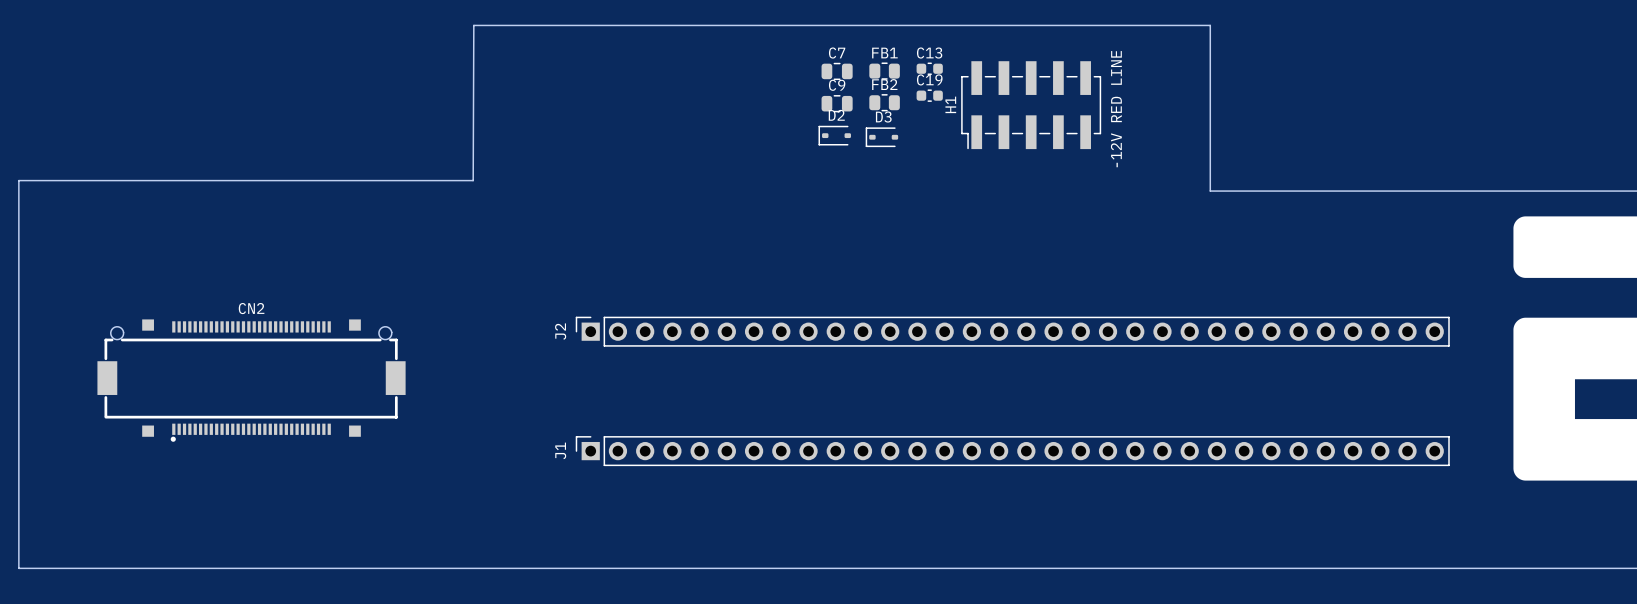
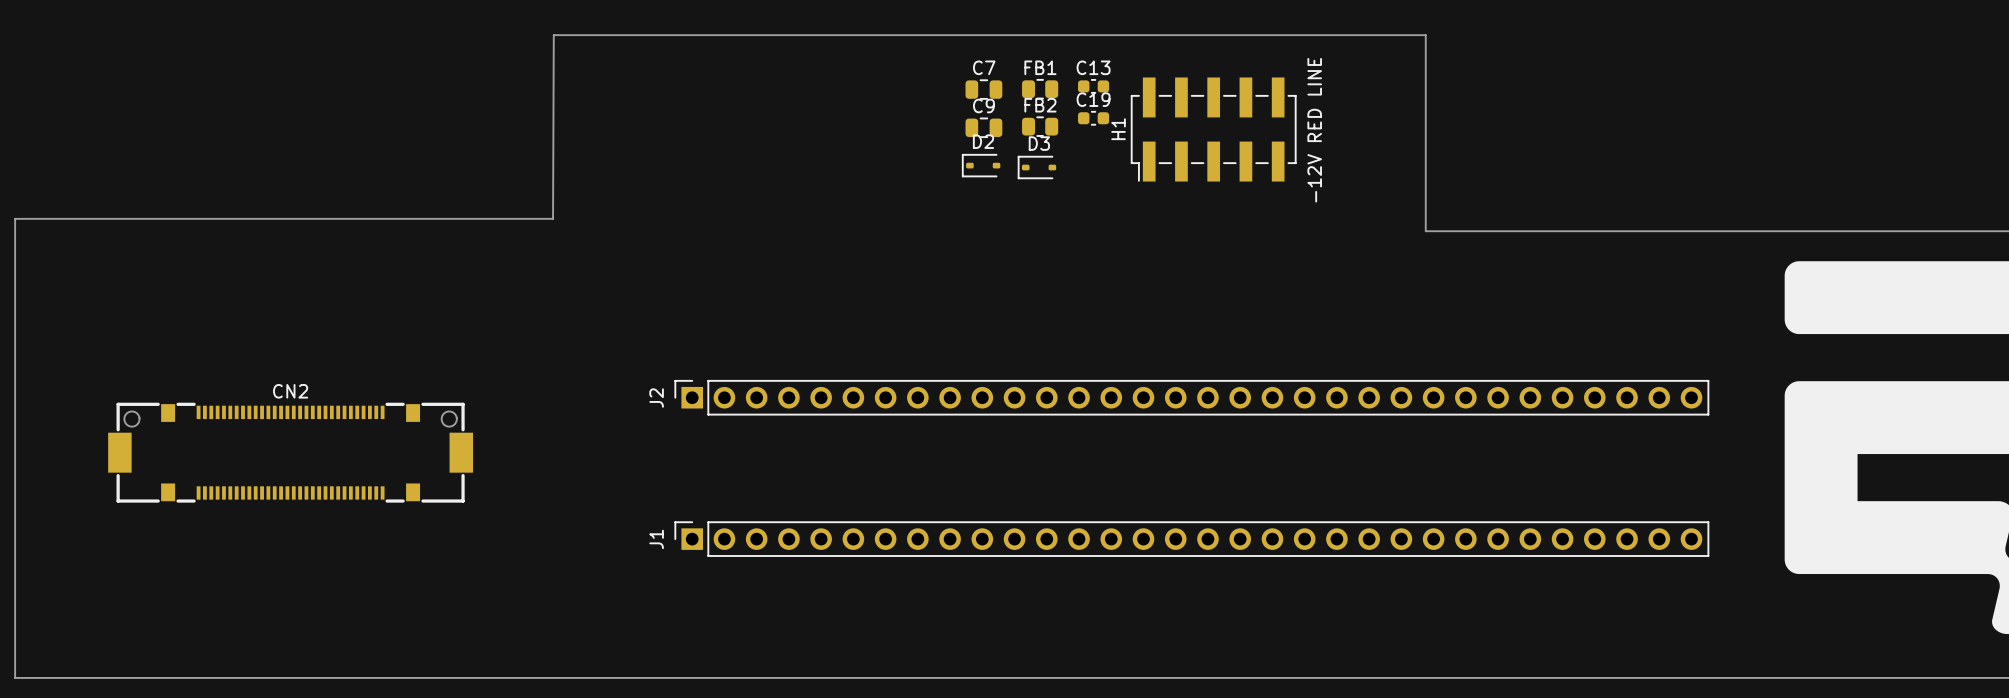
CN2 footprint: [97, 319, 406, 442] -> [108, 402, 474, 503]

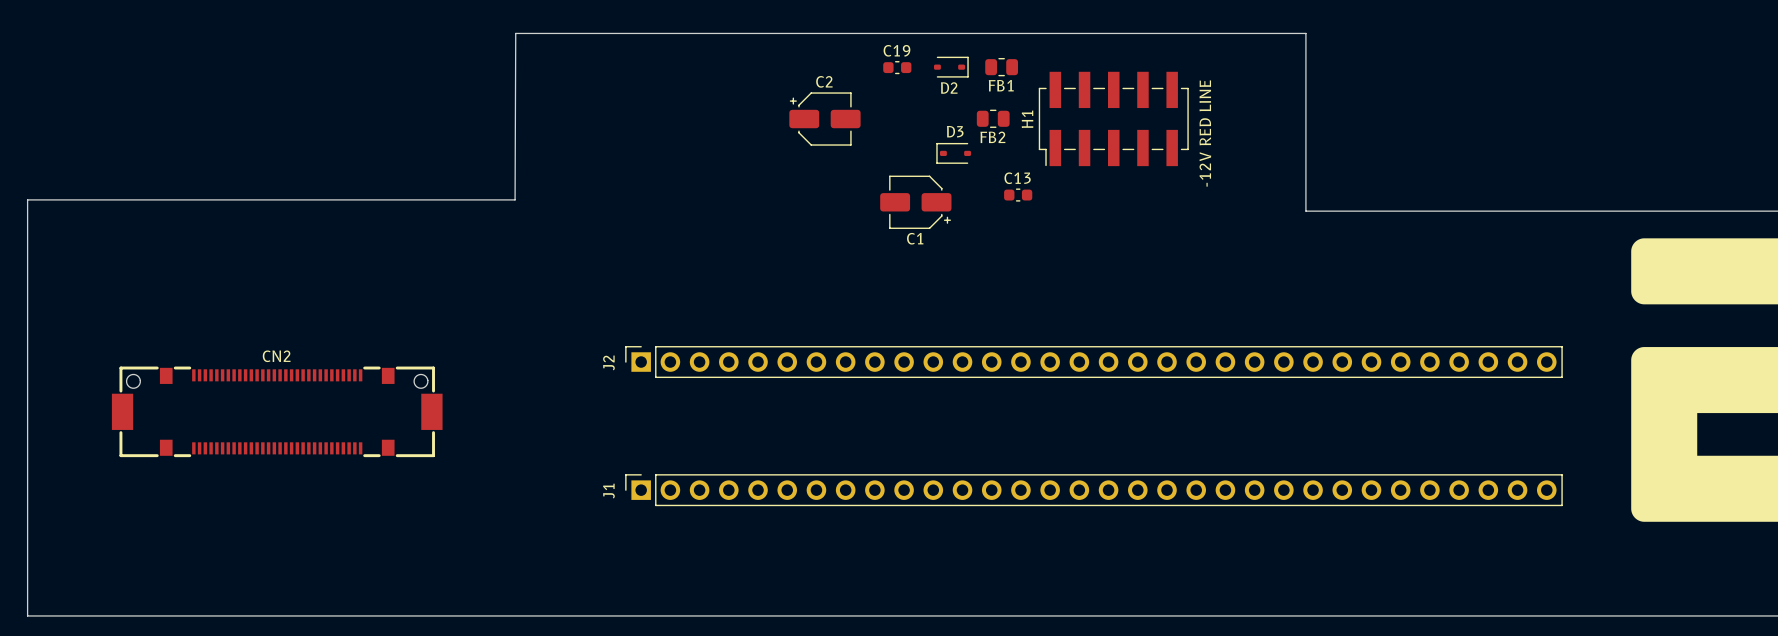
FB1 name position: FB1 (1040, 67) -> FB1 (1001, 85)
C13 position: (1093, 86) -> (1018, 195)
C7: (983, 89) -> none
FB1 position: (1040, 89) -> (1001, 67)
FB2 name position: FB2 (1040, 105) -> FB2 (992, 137)
C19 position: (1093, 118) -> (897, 67)
FB2 position: (1040, 126) -> (993, 118)
C9: (983, 127) -> none
C2: none -> (824, 119)
D2 rotation: 0° (981, 165) -> 180° (951, 67)
D2 position: (981, 165) -> (951, 67)
C1: none -> (915, 202)

